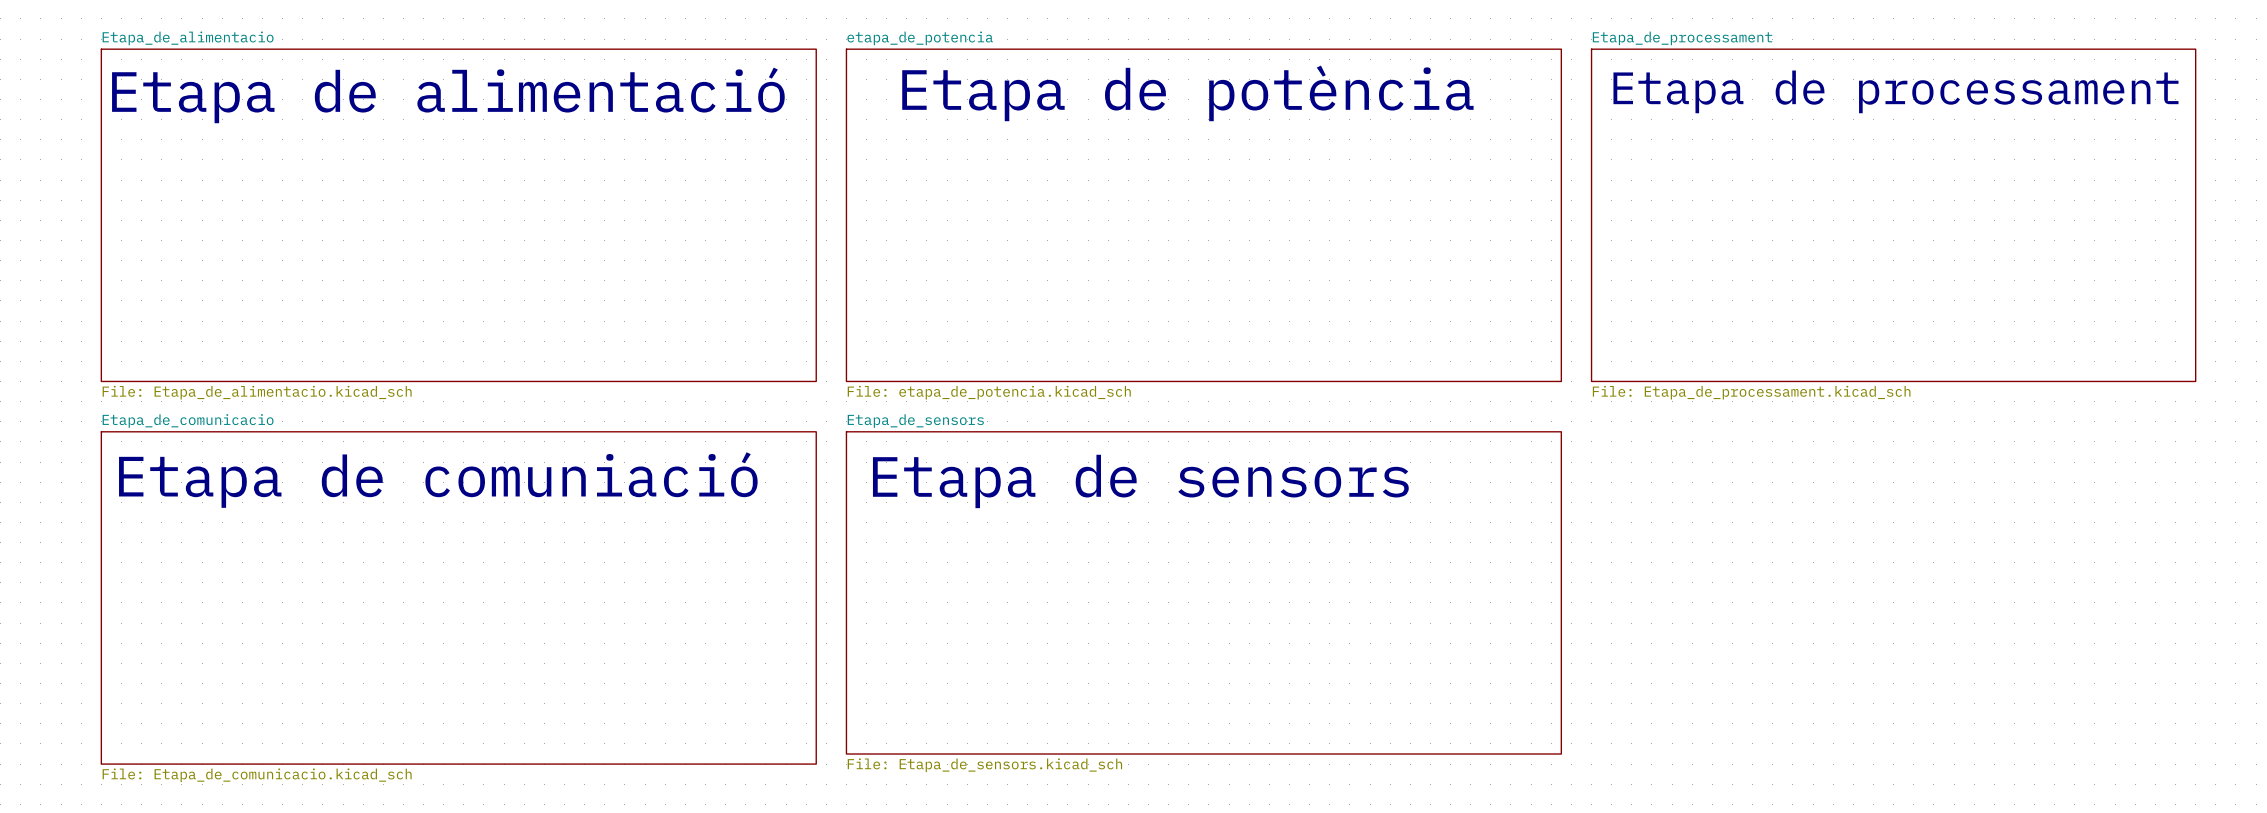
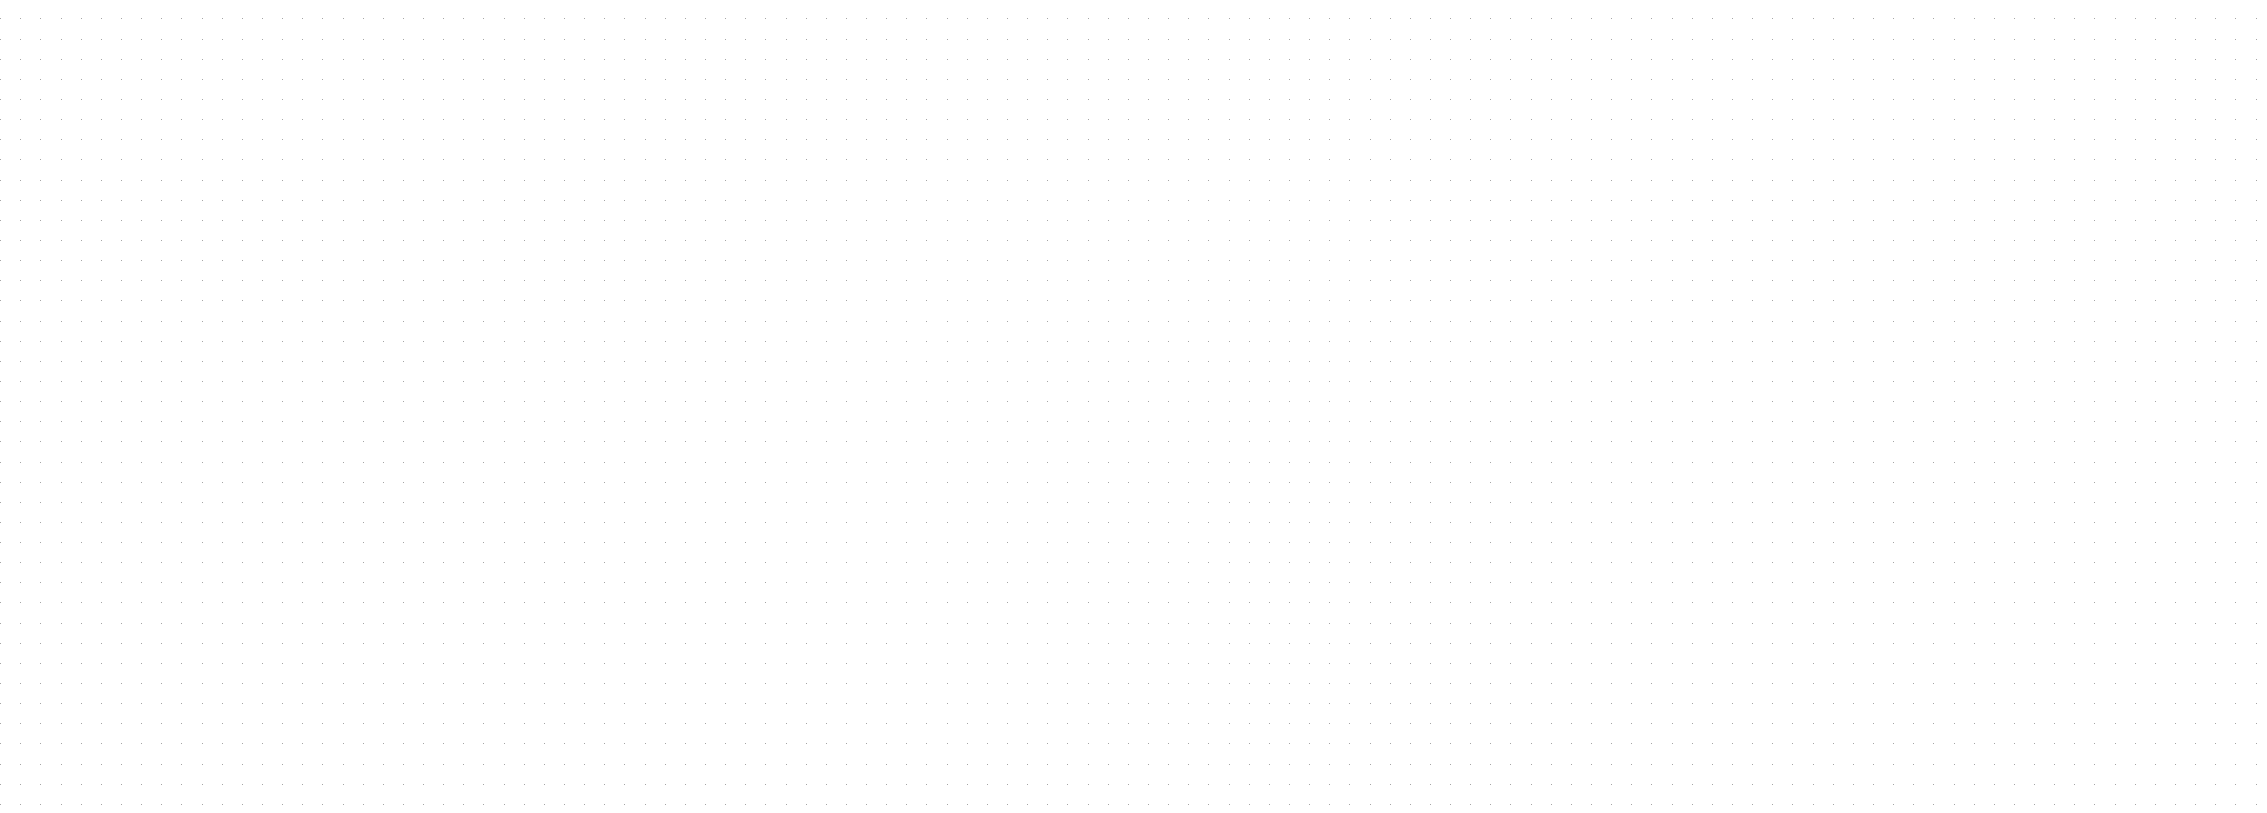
text: Etapa de processament (1895, 91) -> none
text: Etapa de potència (1187, 93) -> none
text: Etapa de alimentació (448, 95) -> none
sheet Etapa_de_alimentacio: File: Etapa_de_alimentacio.kicad_sch (458, 215) -> none
sheet etapa_de_potencia: File: etapa_de_potencia.kicad_sch (1203, 215) -> none
sheet Etapa_de_processament: File: Etapa_de_processament.kicad_sch (1893, 215) -> none
text: Etapa de comuniació (438, 480) -> none
text: Etapa de sensors (1140, 481) -> none
sheet Etapa_de_sensors: File: Etapa_de_sensors.kicad_sch (1203, 592) -> none
sheet Etapa_de_comunicacio: File: Etapa_de_comunicacio.kicad_sch (458, 597) -> none

